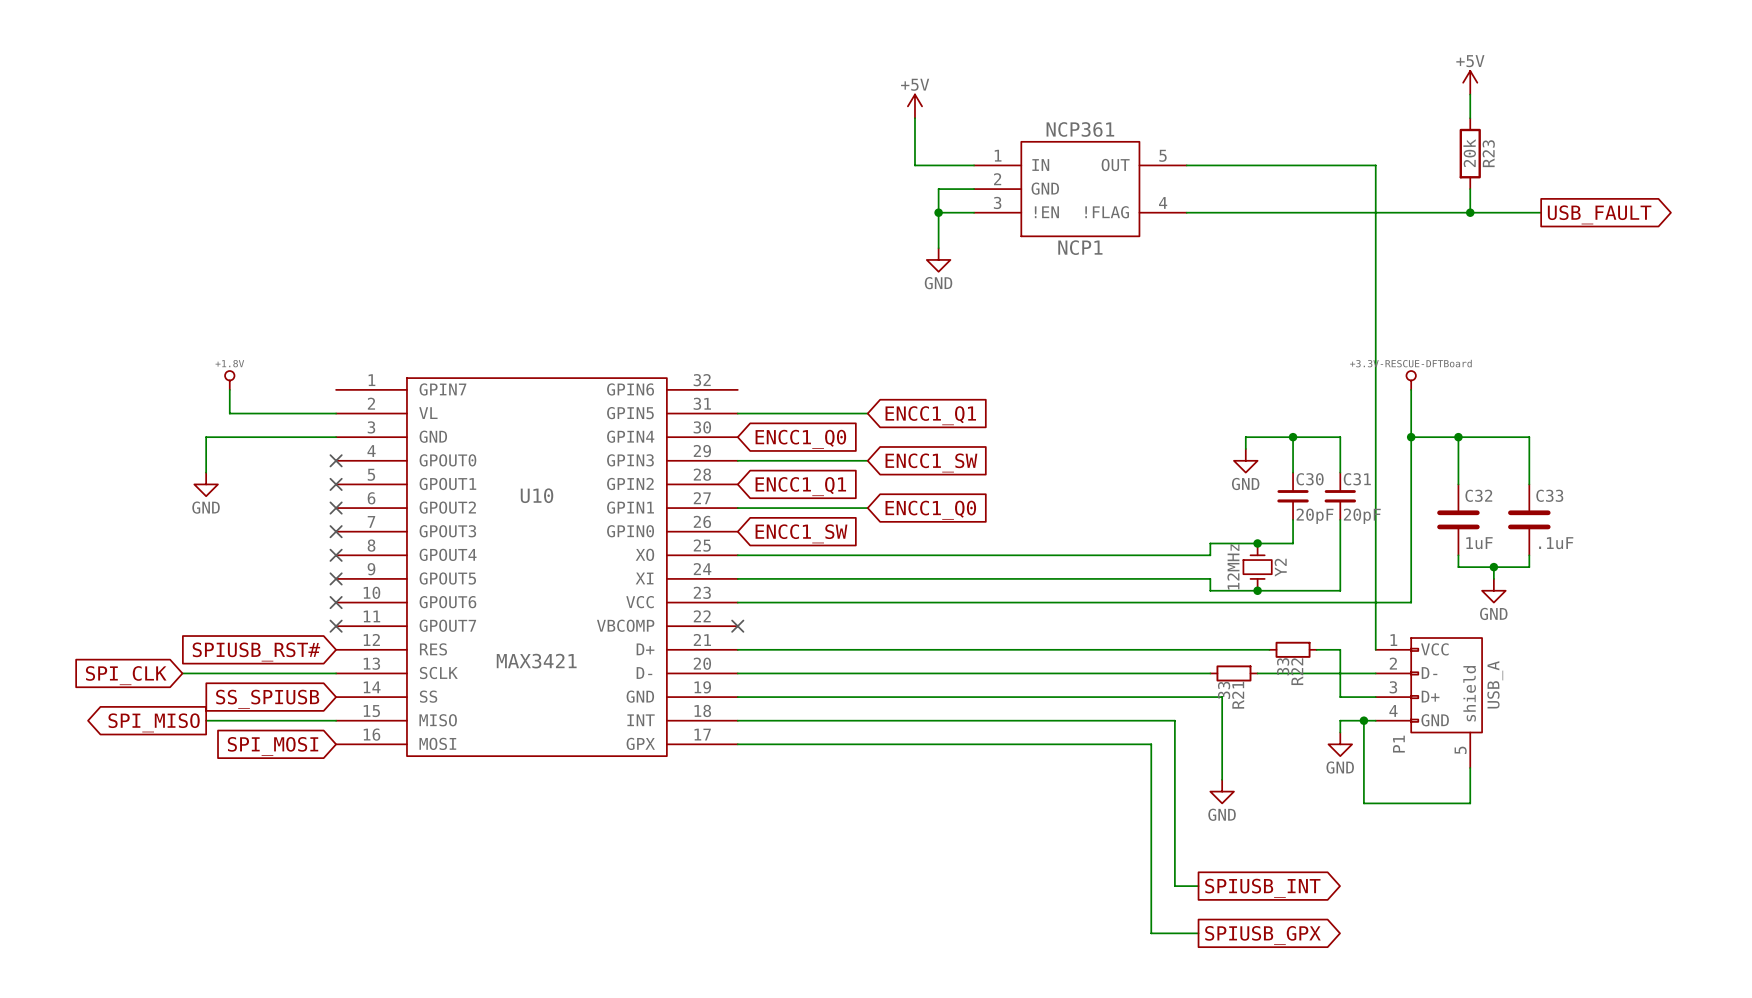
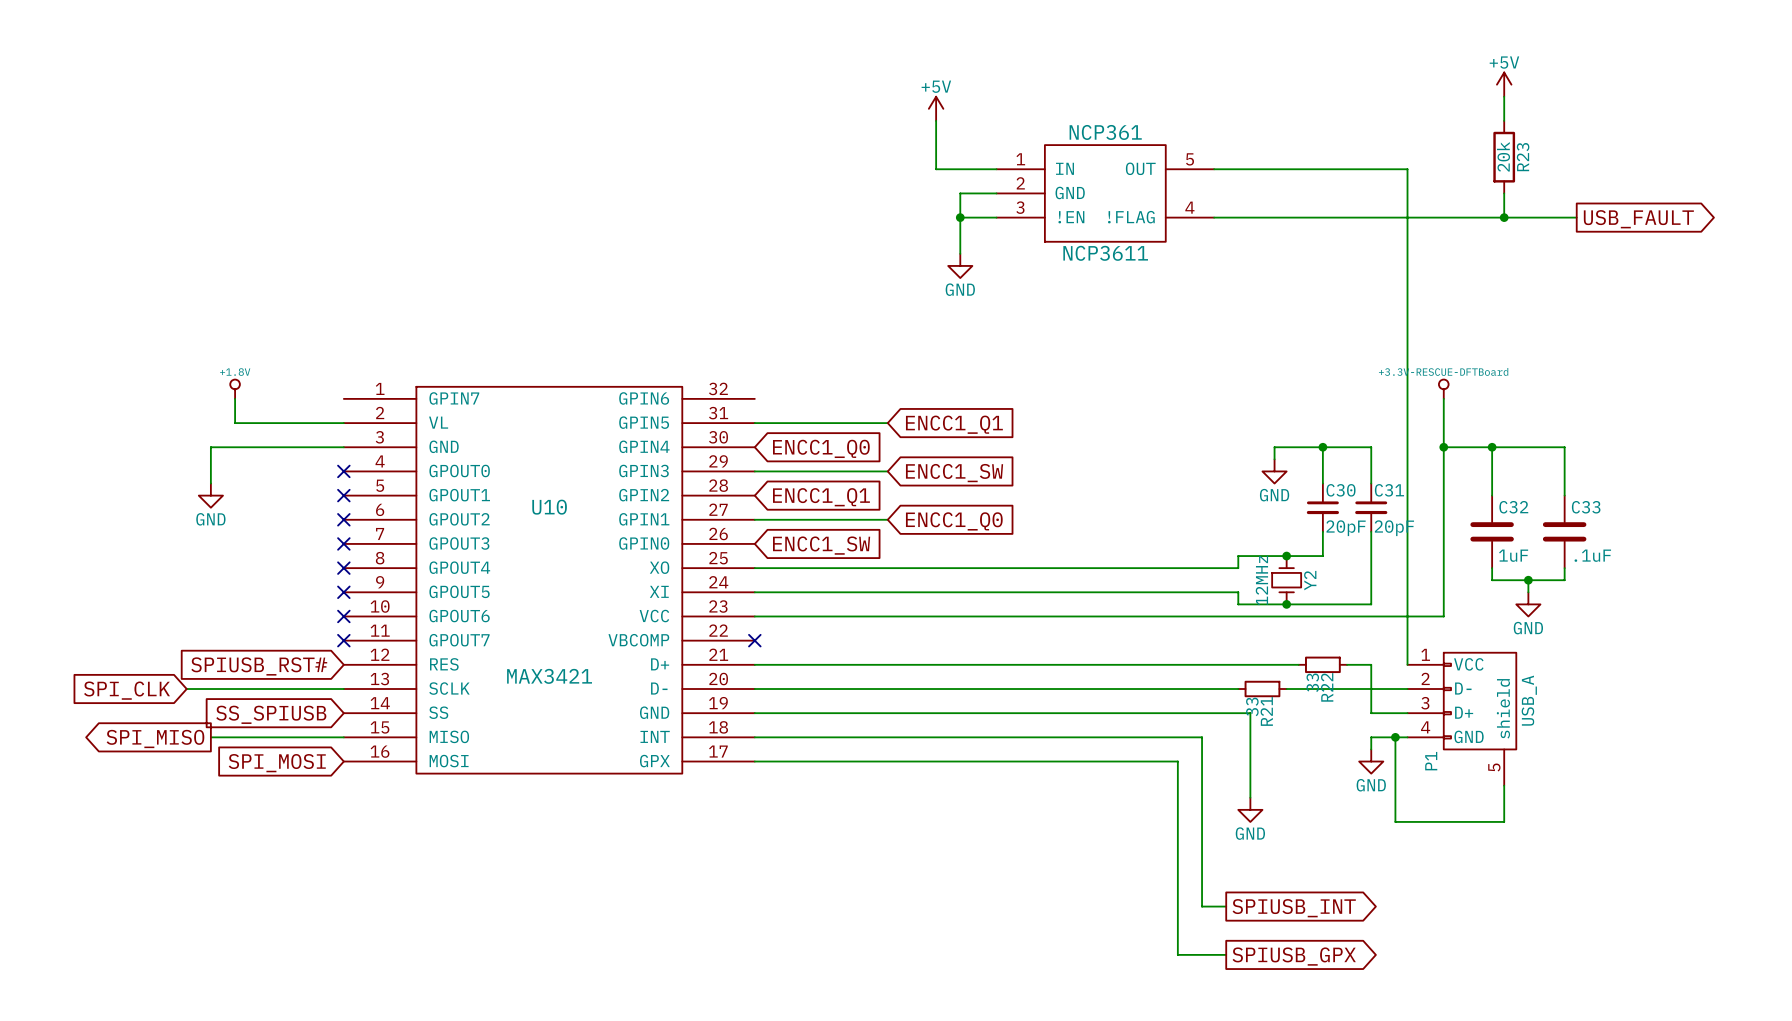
NCP1 name: NCP1 (1080, 247) -> NCP3611 (1105, 253)

